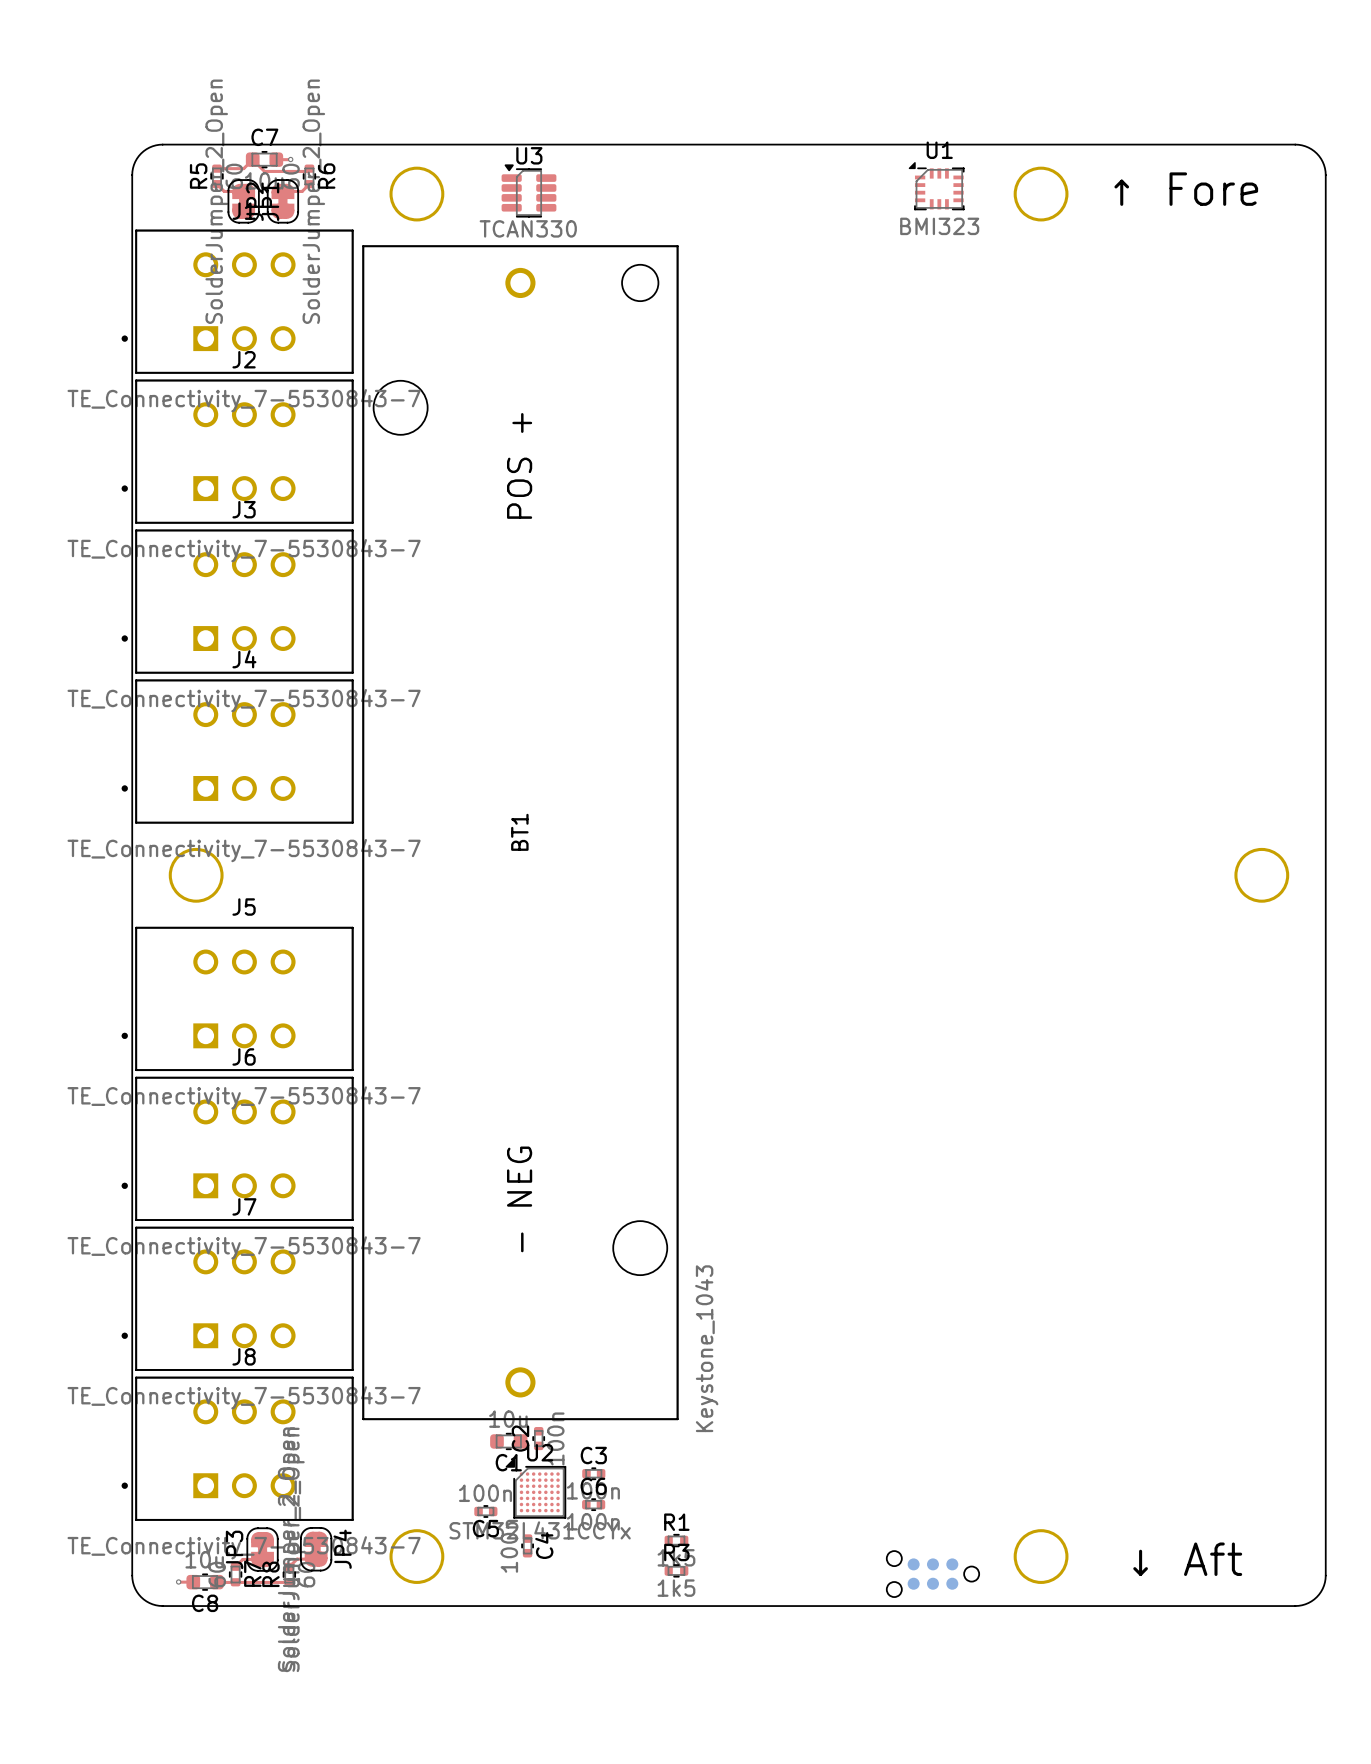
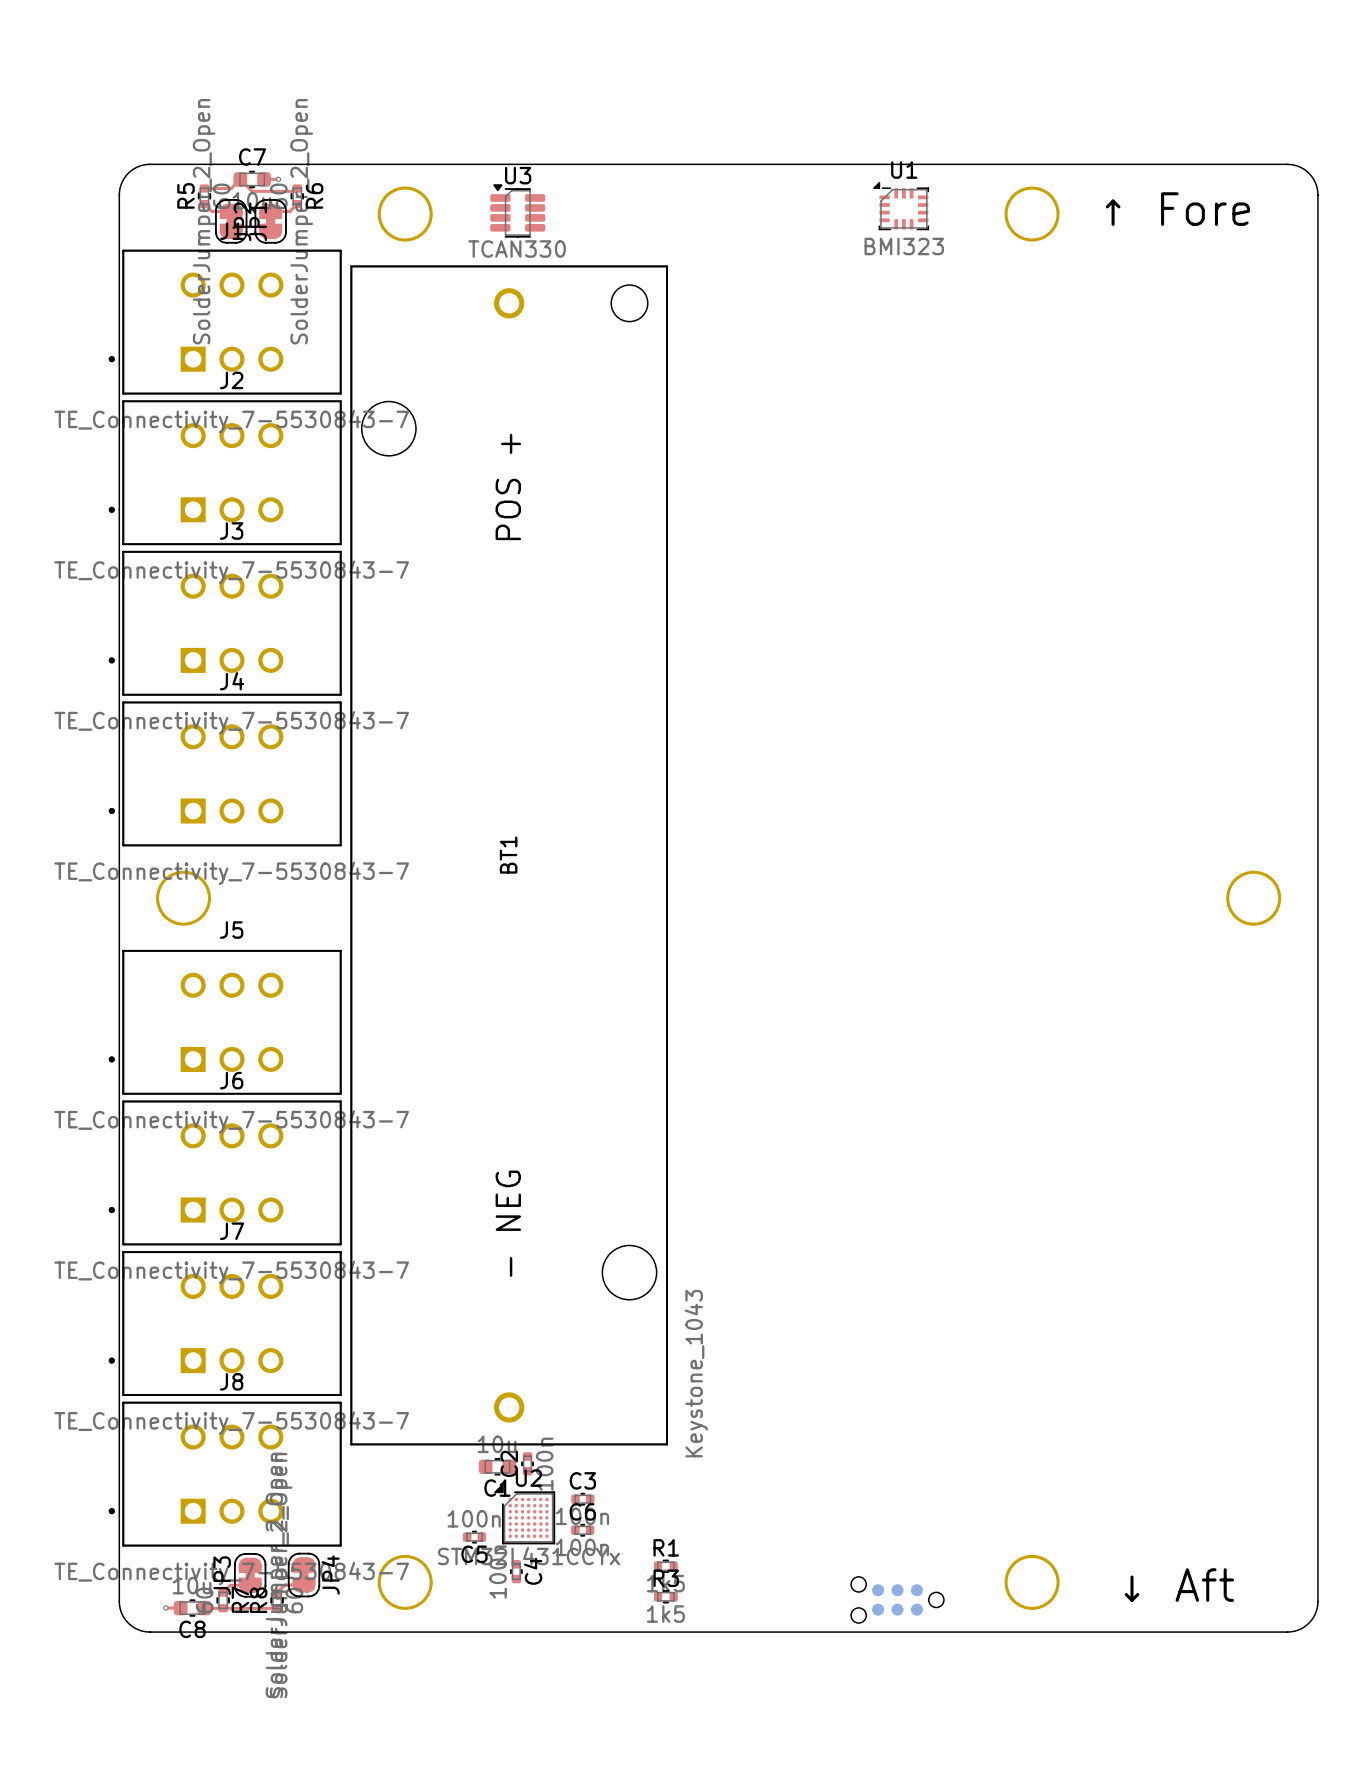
U1 position: (936, 186) -> (901, 206)
part position: (932, 1574) -> (897, 1599)

